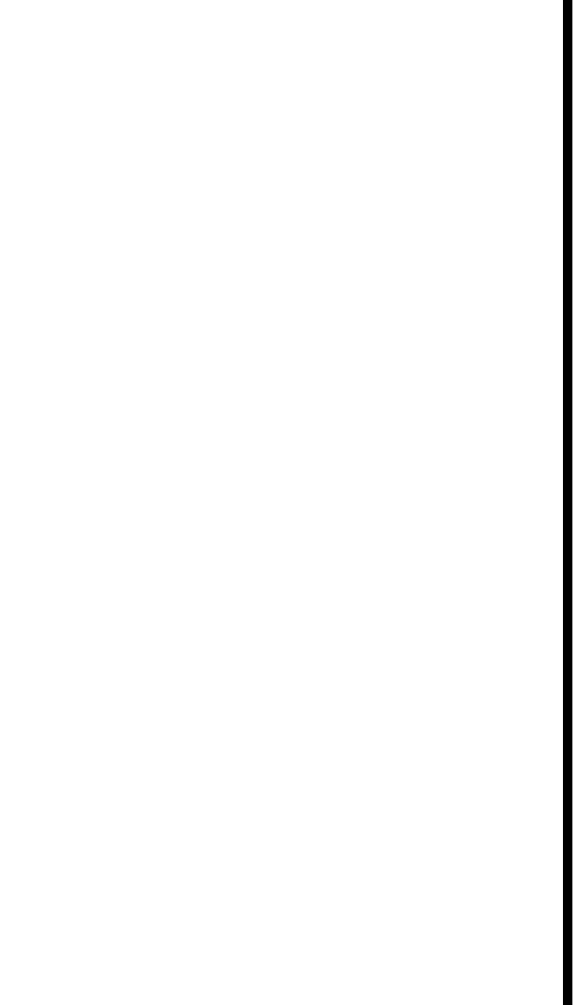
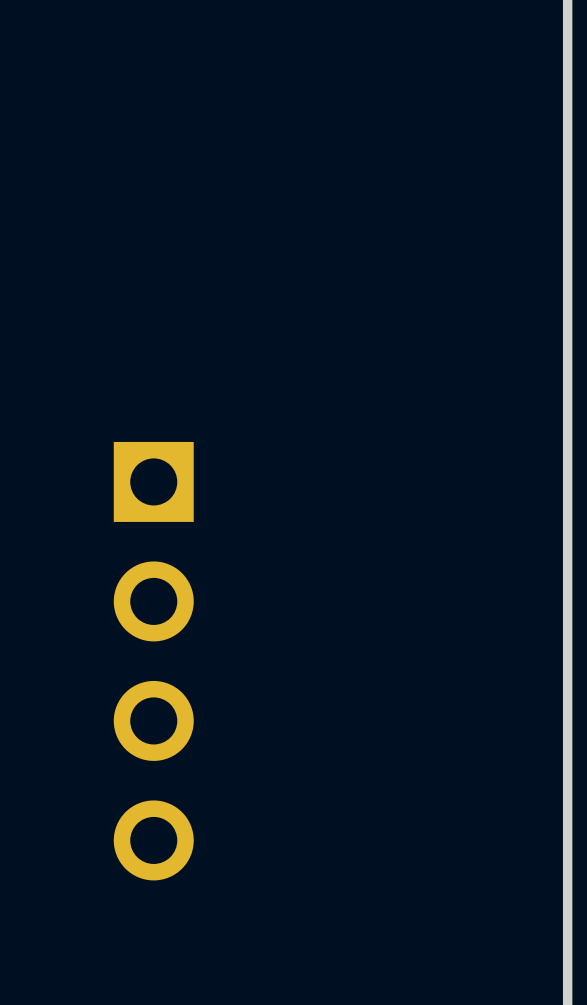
part: none -> (153, 661)

